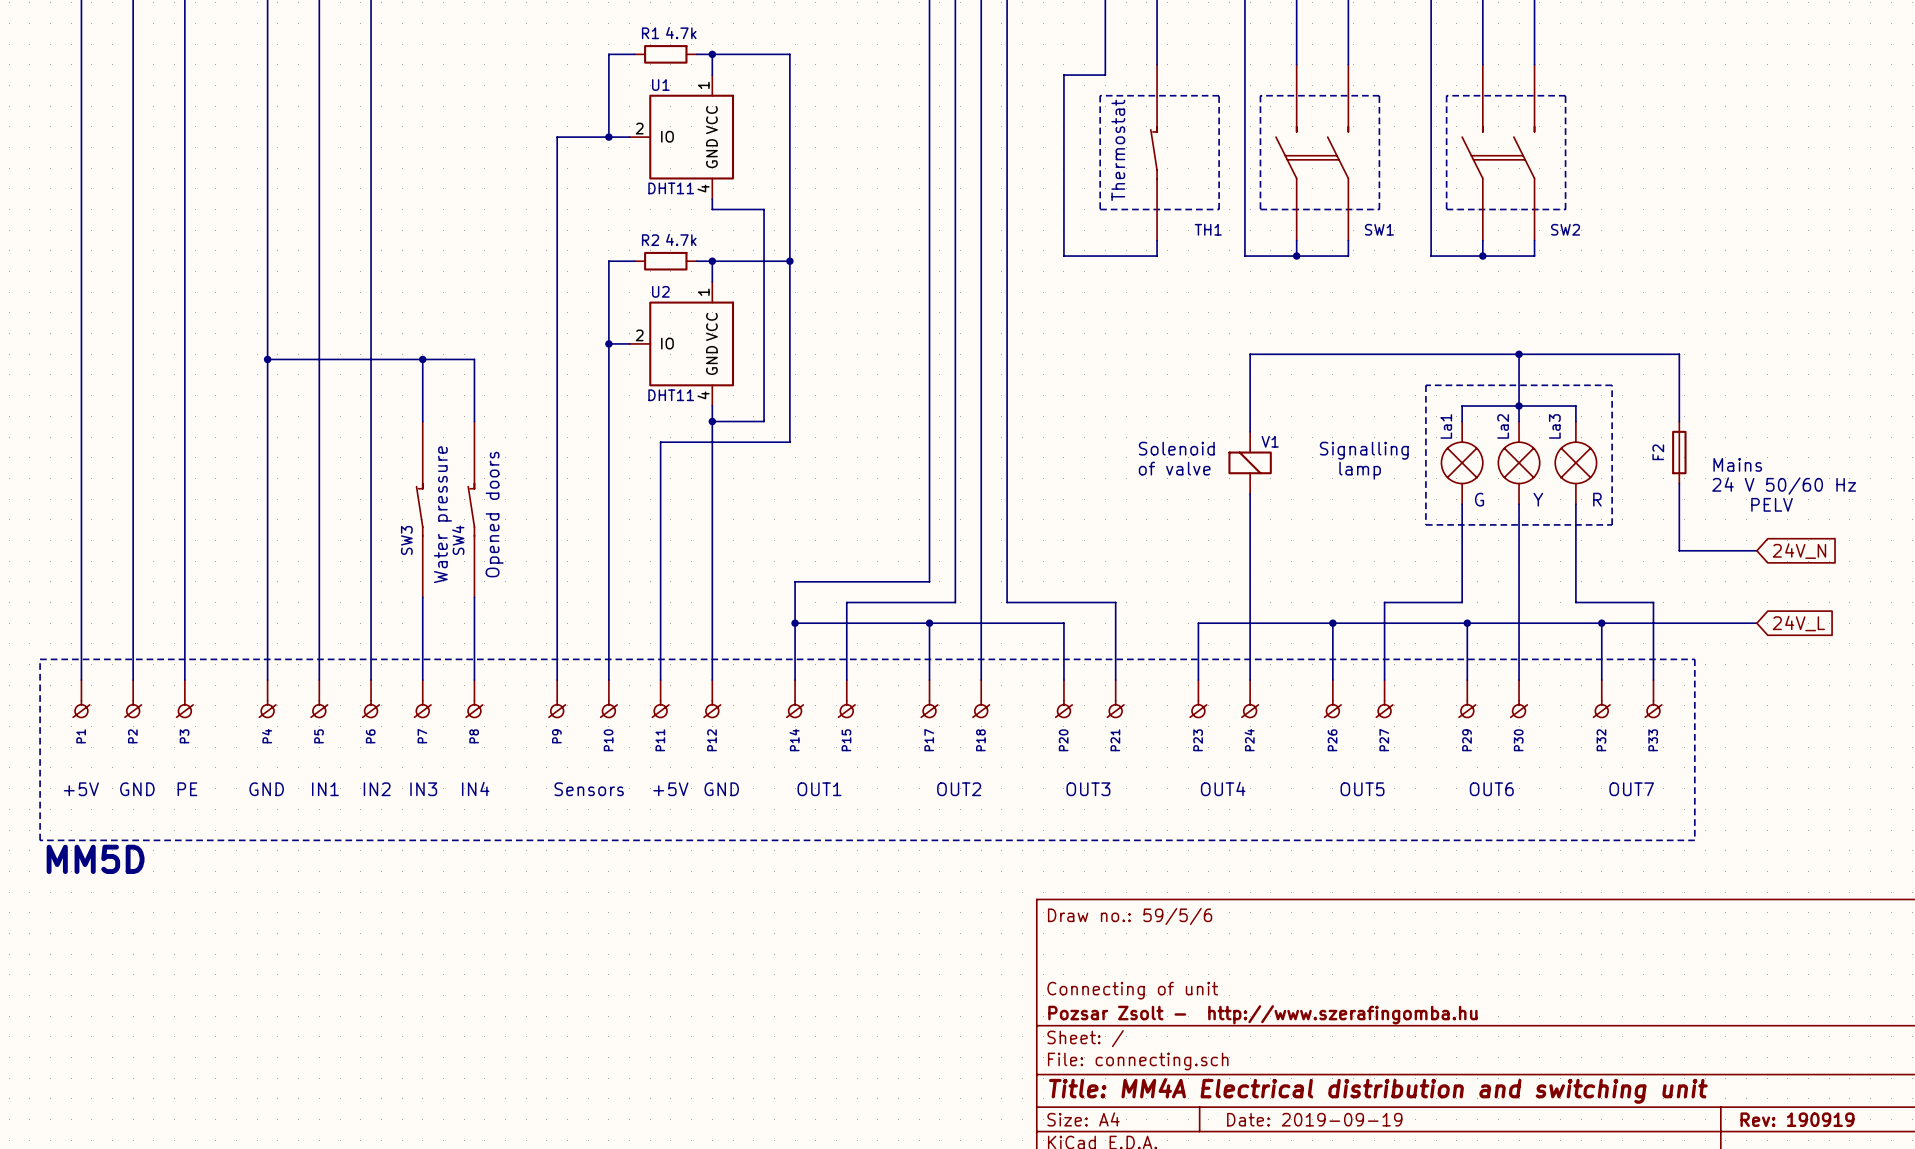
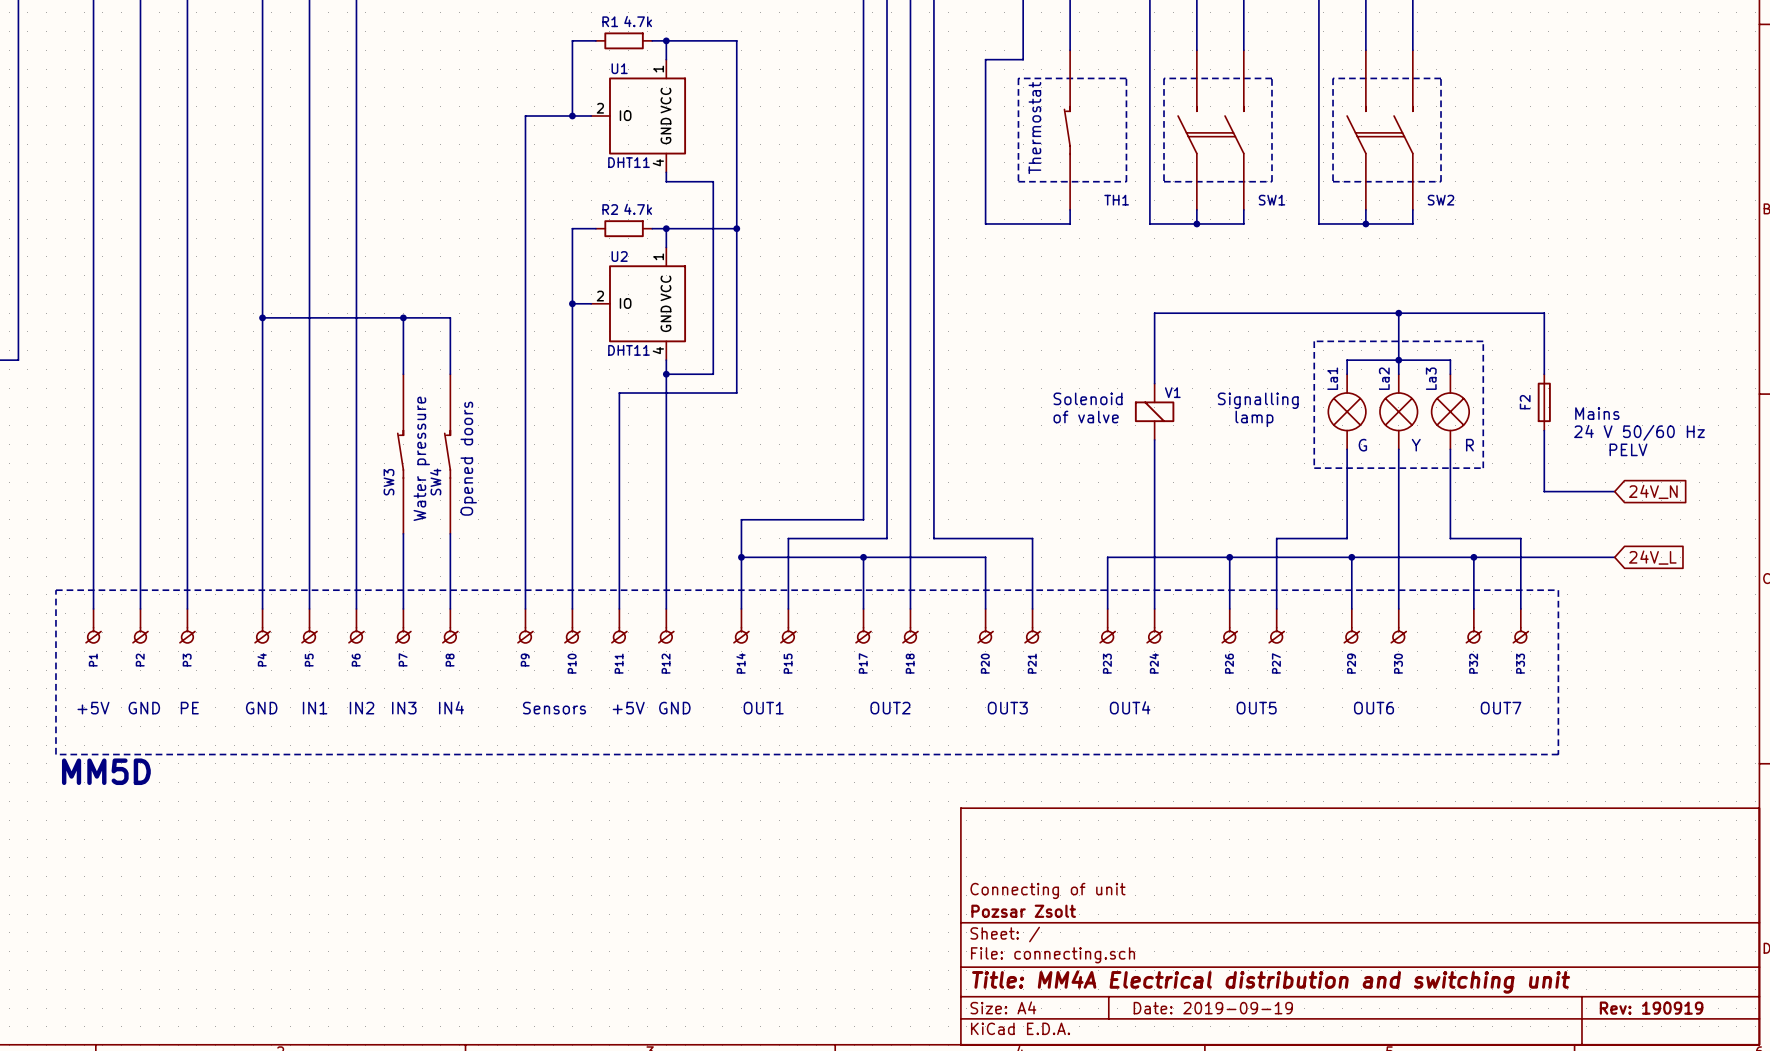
title block: Draw no.: 59/5/6 (1130, 916) -> none
title block: Pozsar Zsolt - http://www.szerafingomba.hu (1262, 1014) -> Pozsar Zsolt (1023, 911)

